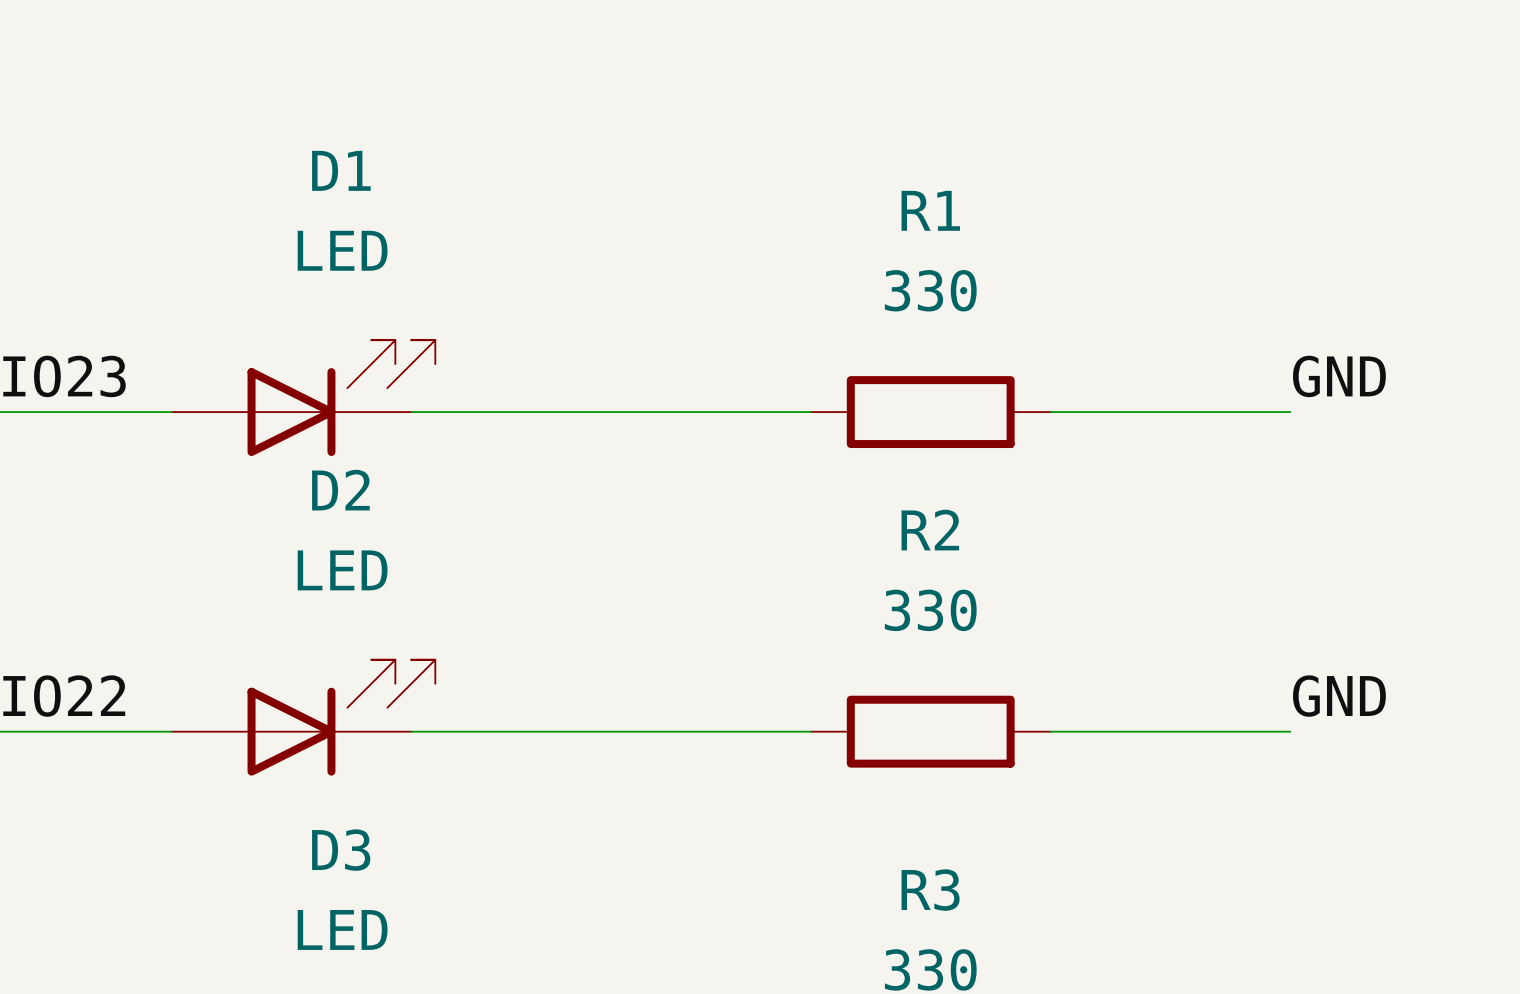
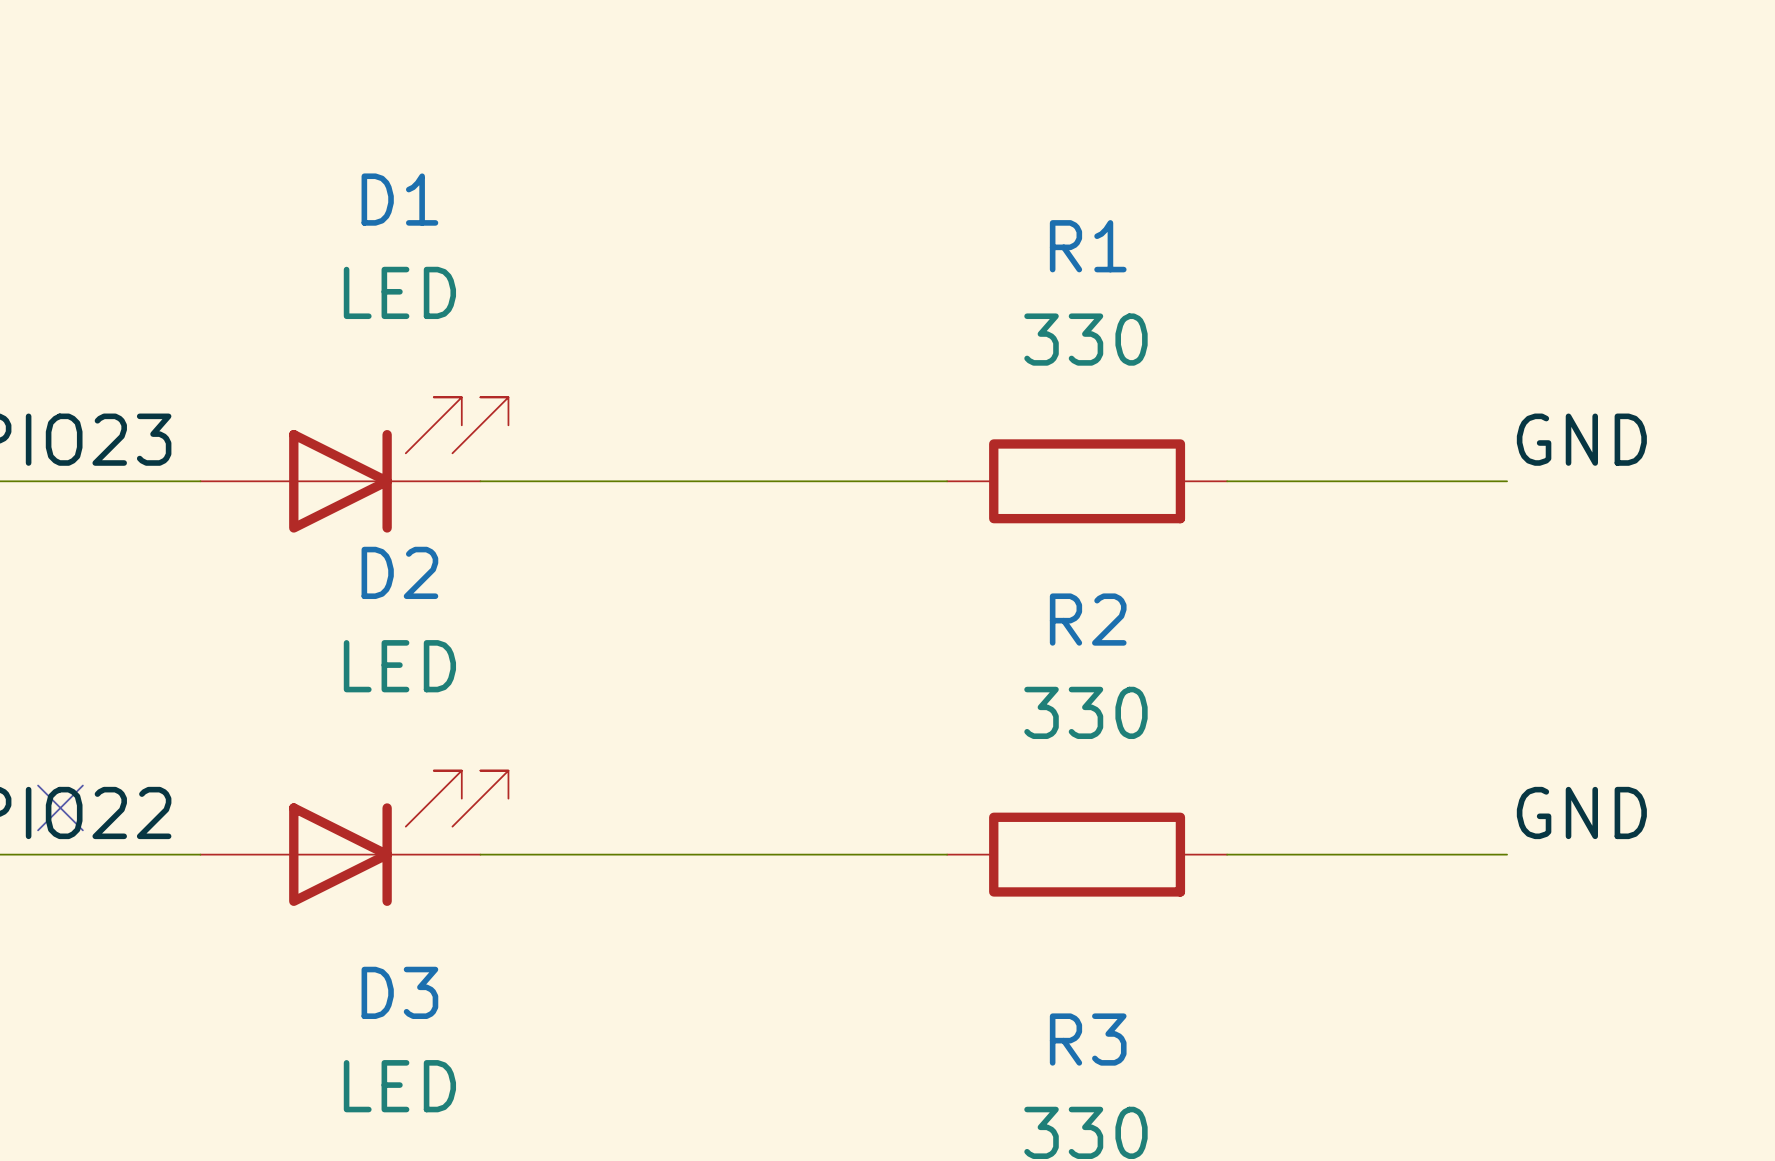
no-connect mark: none -> (60, 807)

